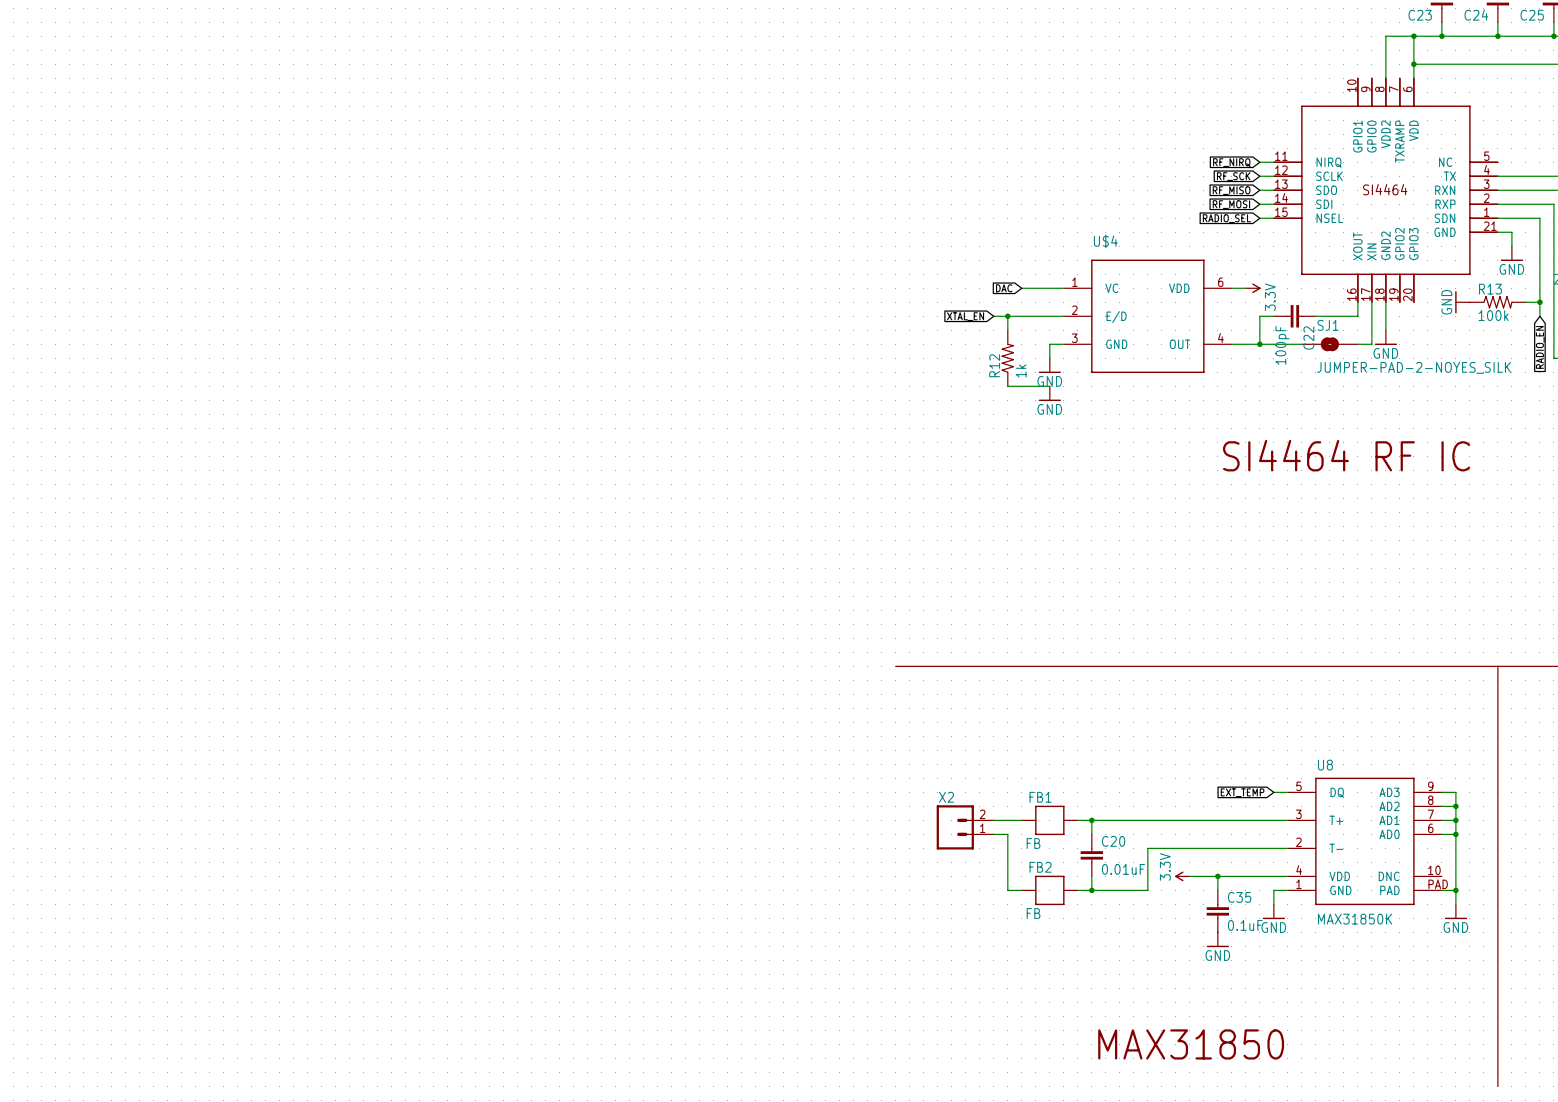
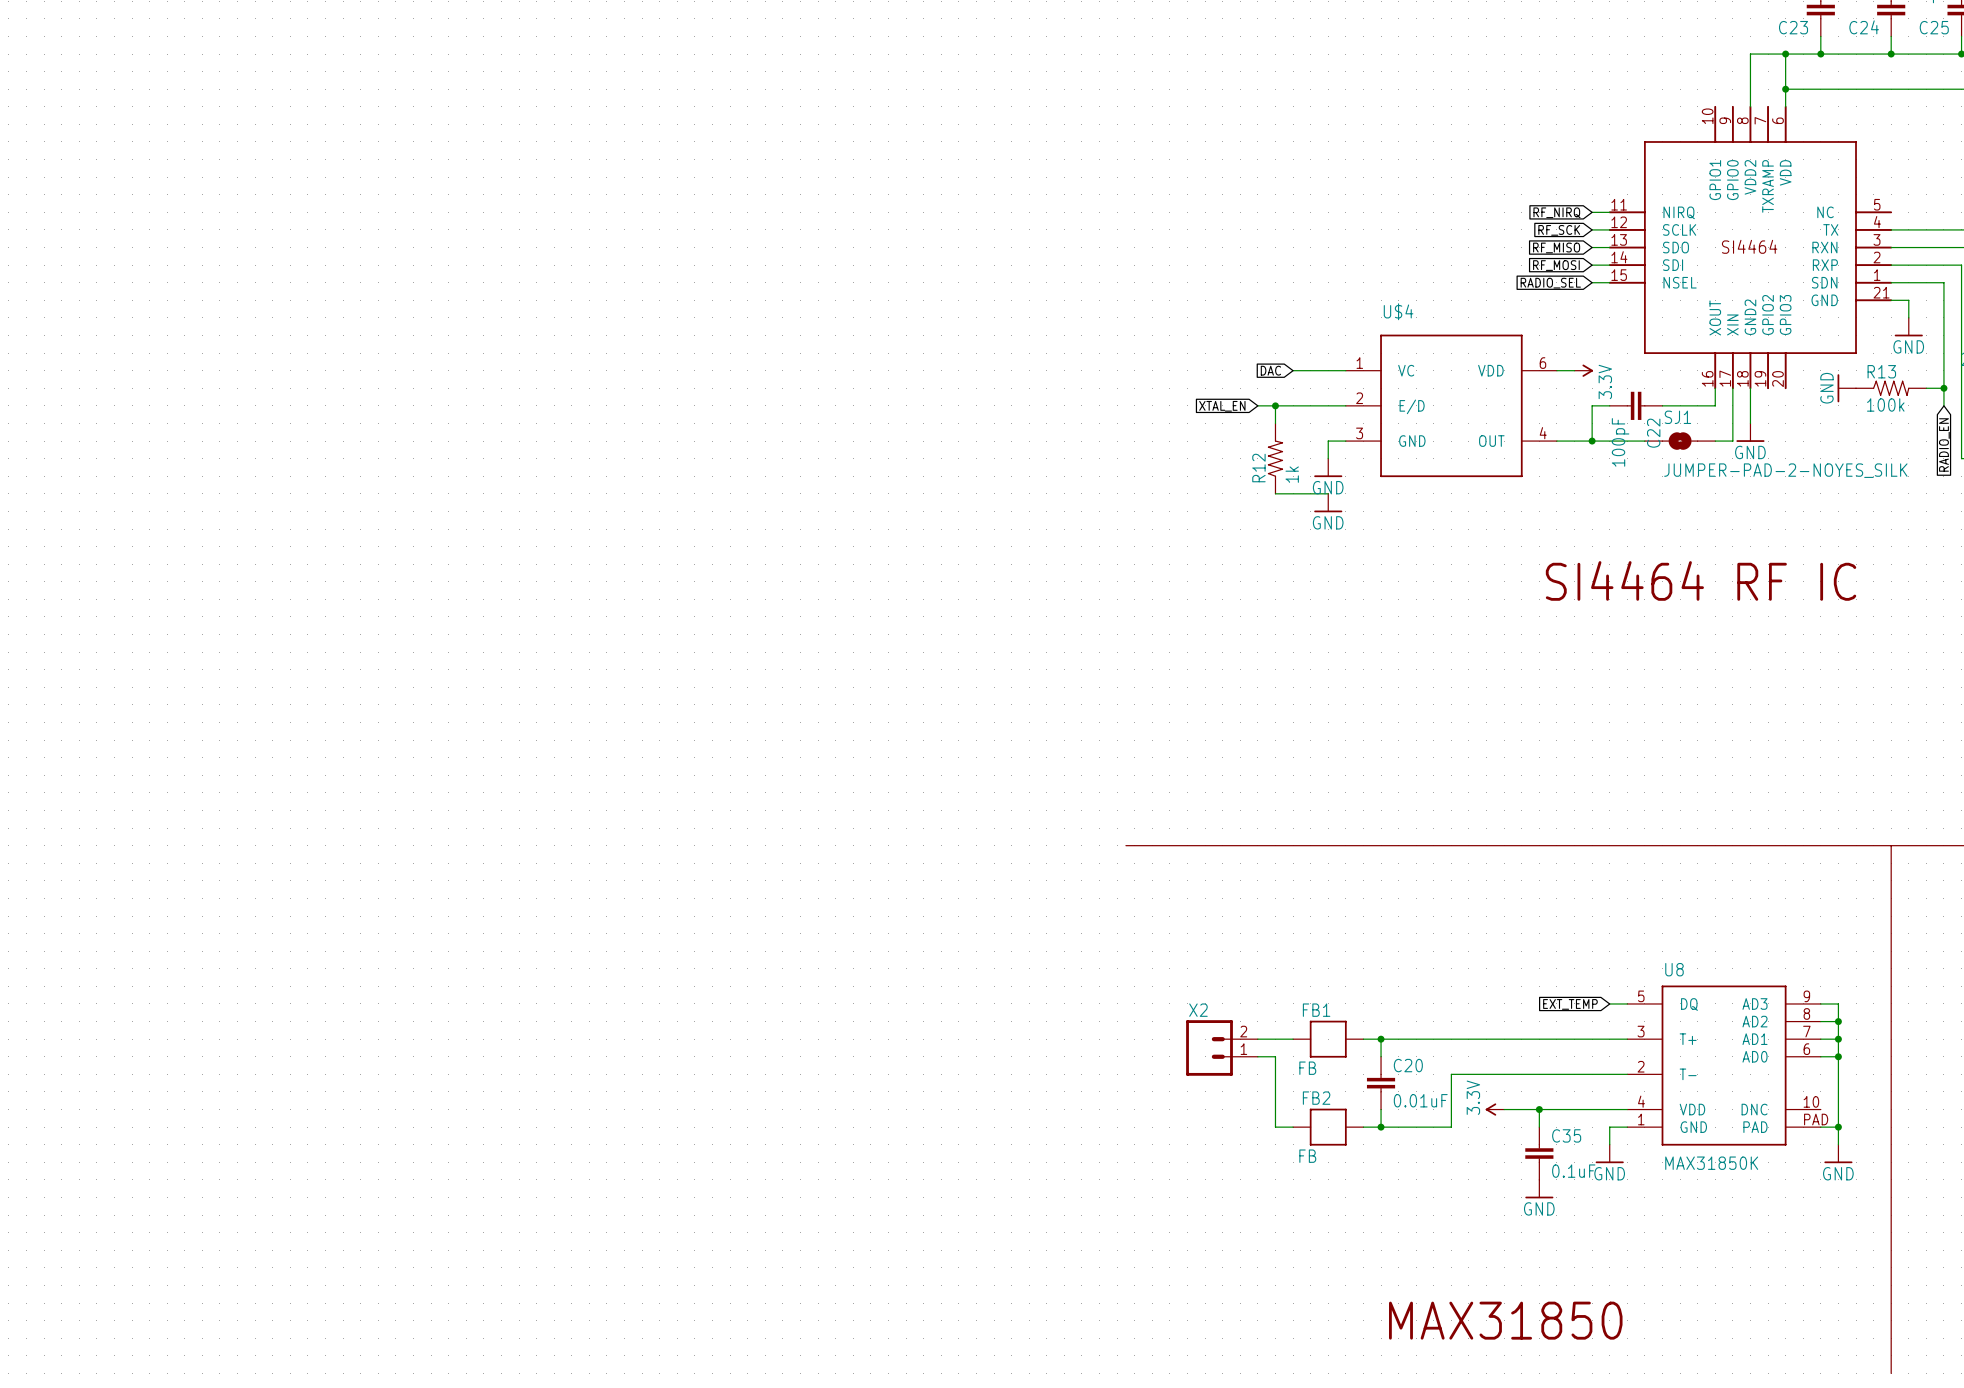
line: none -> (1125, 845) (1134, 845)

